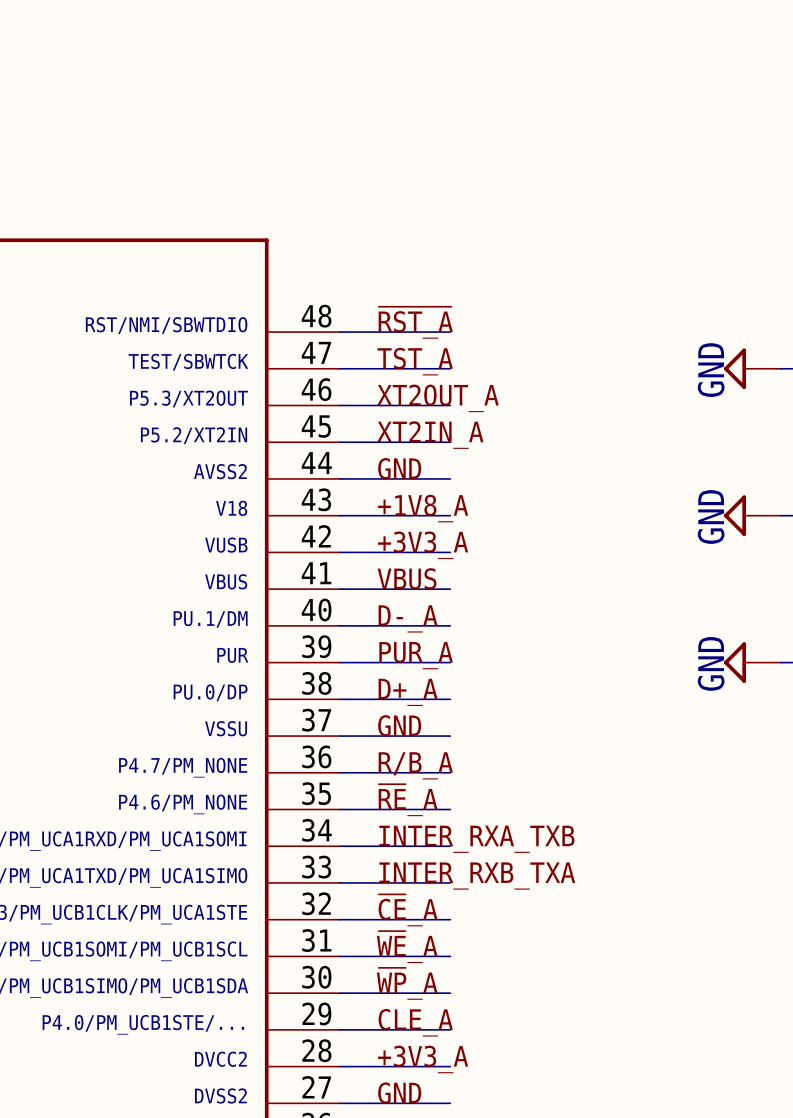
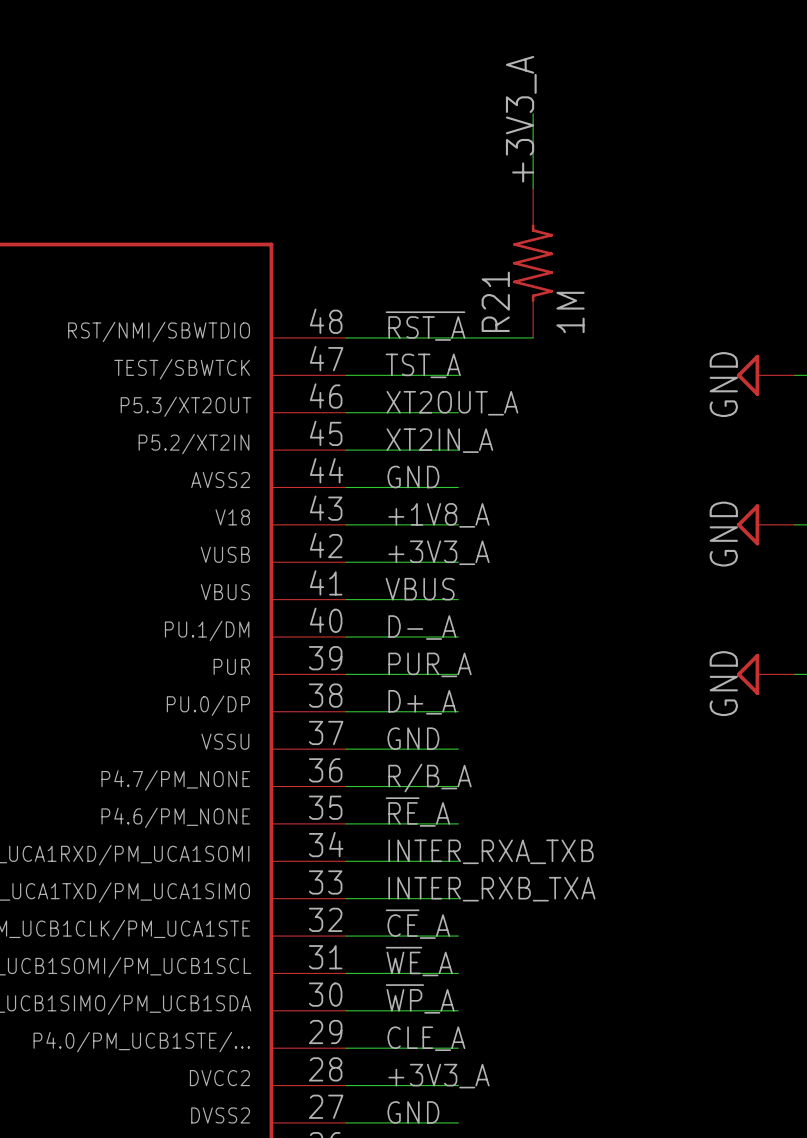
wire: none -> (533, 113) (533, 188)
label: none -> +3V3_A (521, 119)
R21: none -> 1M (533, 263)
wire: none -> (458, 337) (533, 337)

